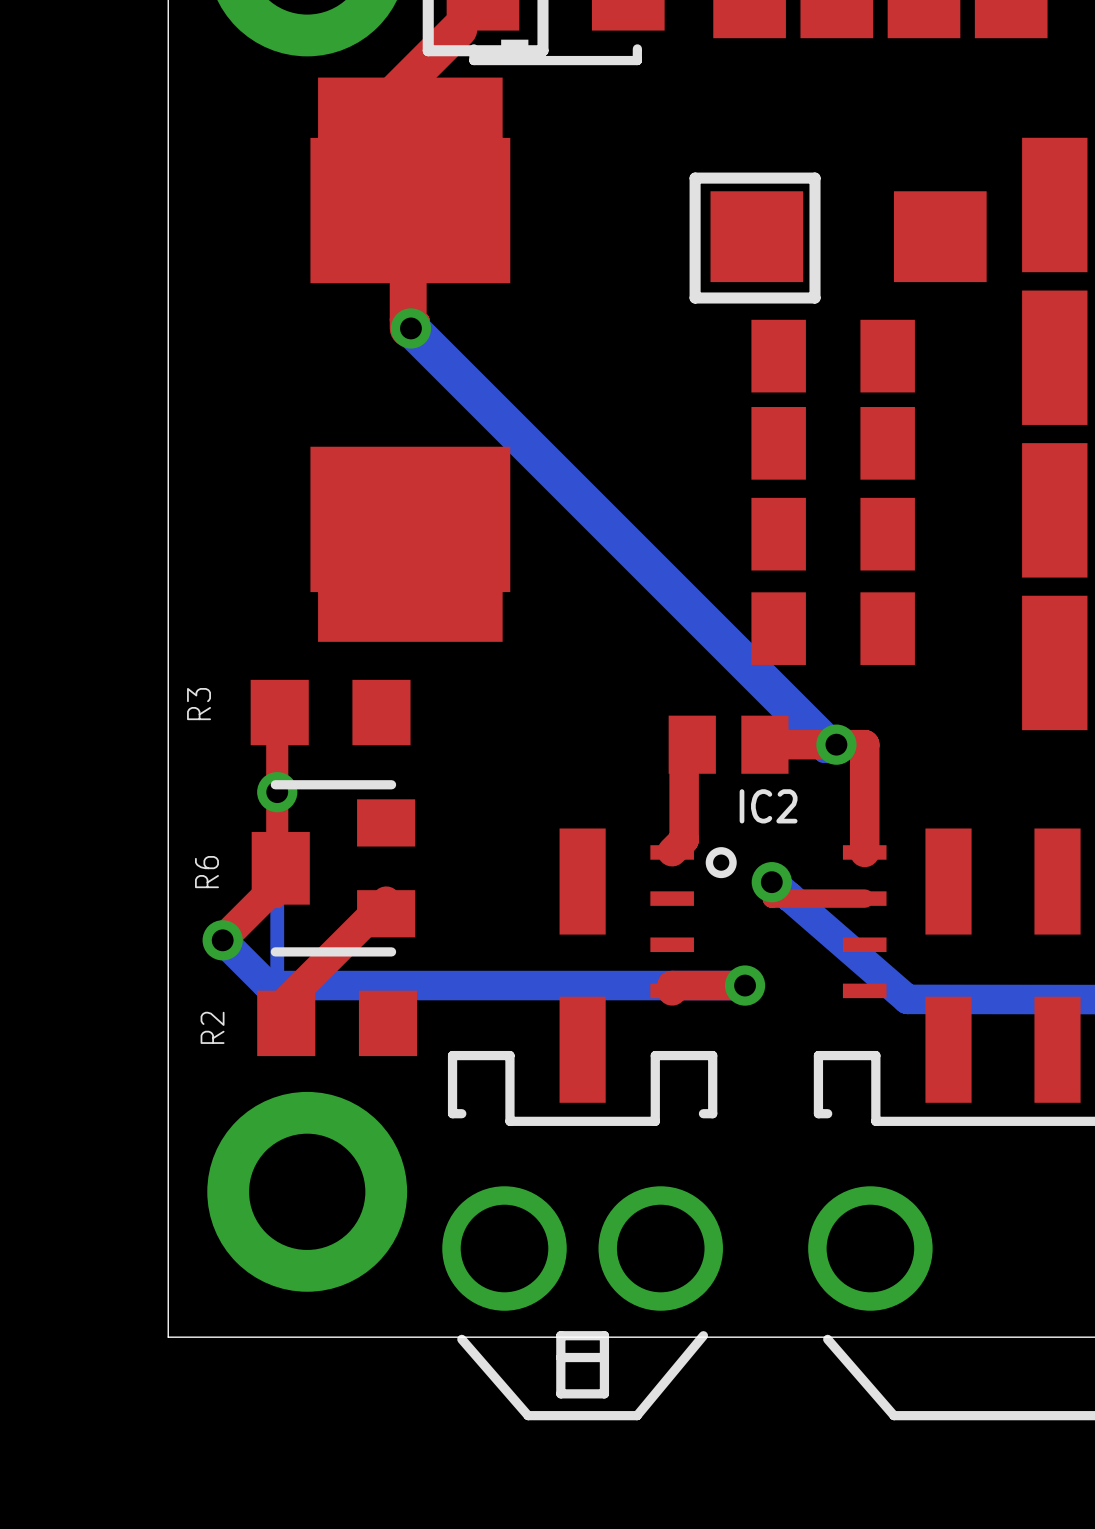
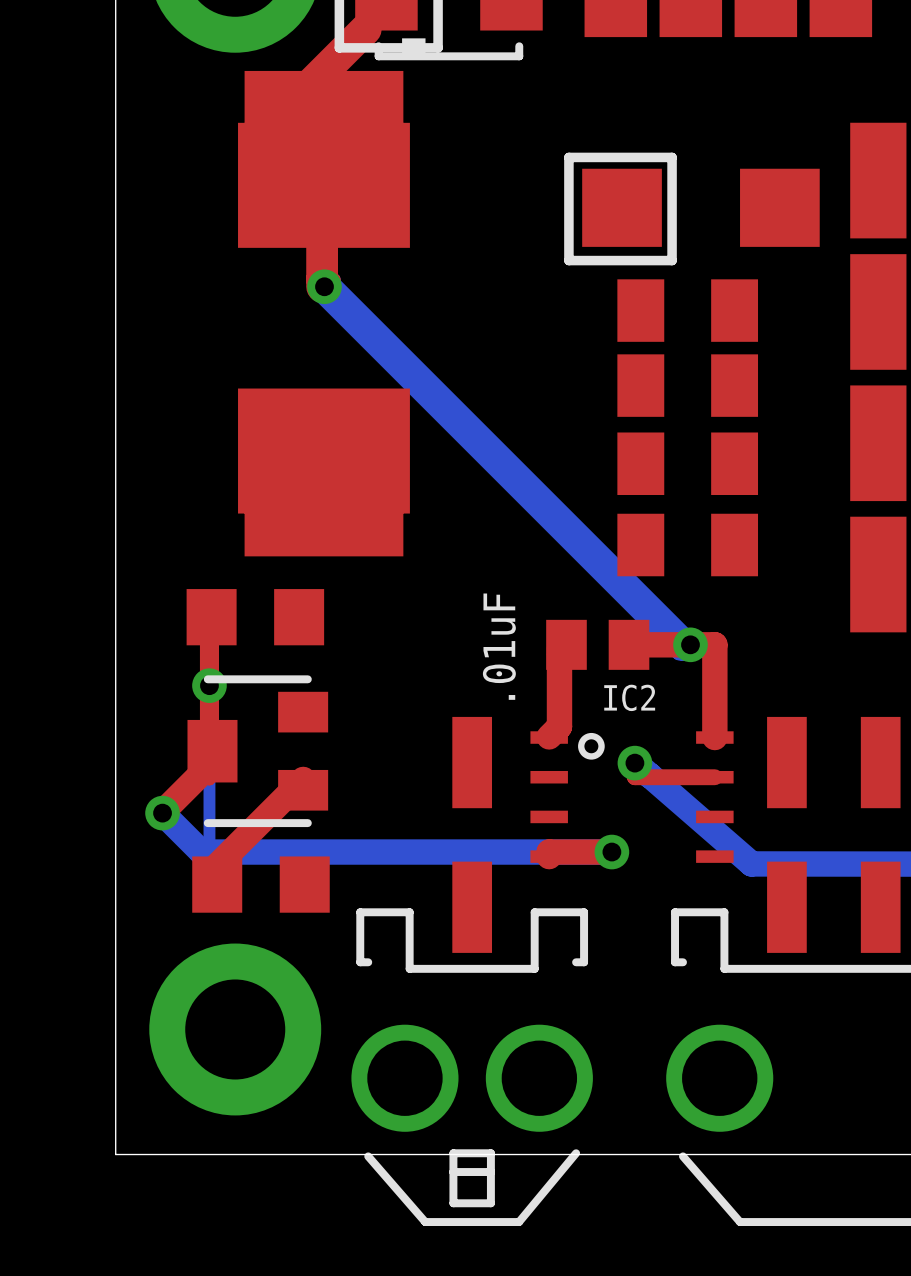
R3 name: R3 (199, 704) -> none
part value: none -> .01uF (499, 646)
R6 name: R6 (206, 872) -> none
R2 name: R2 (212, 1027) -> none

